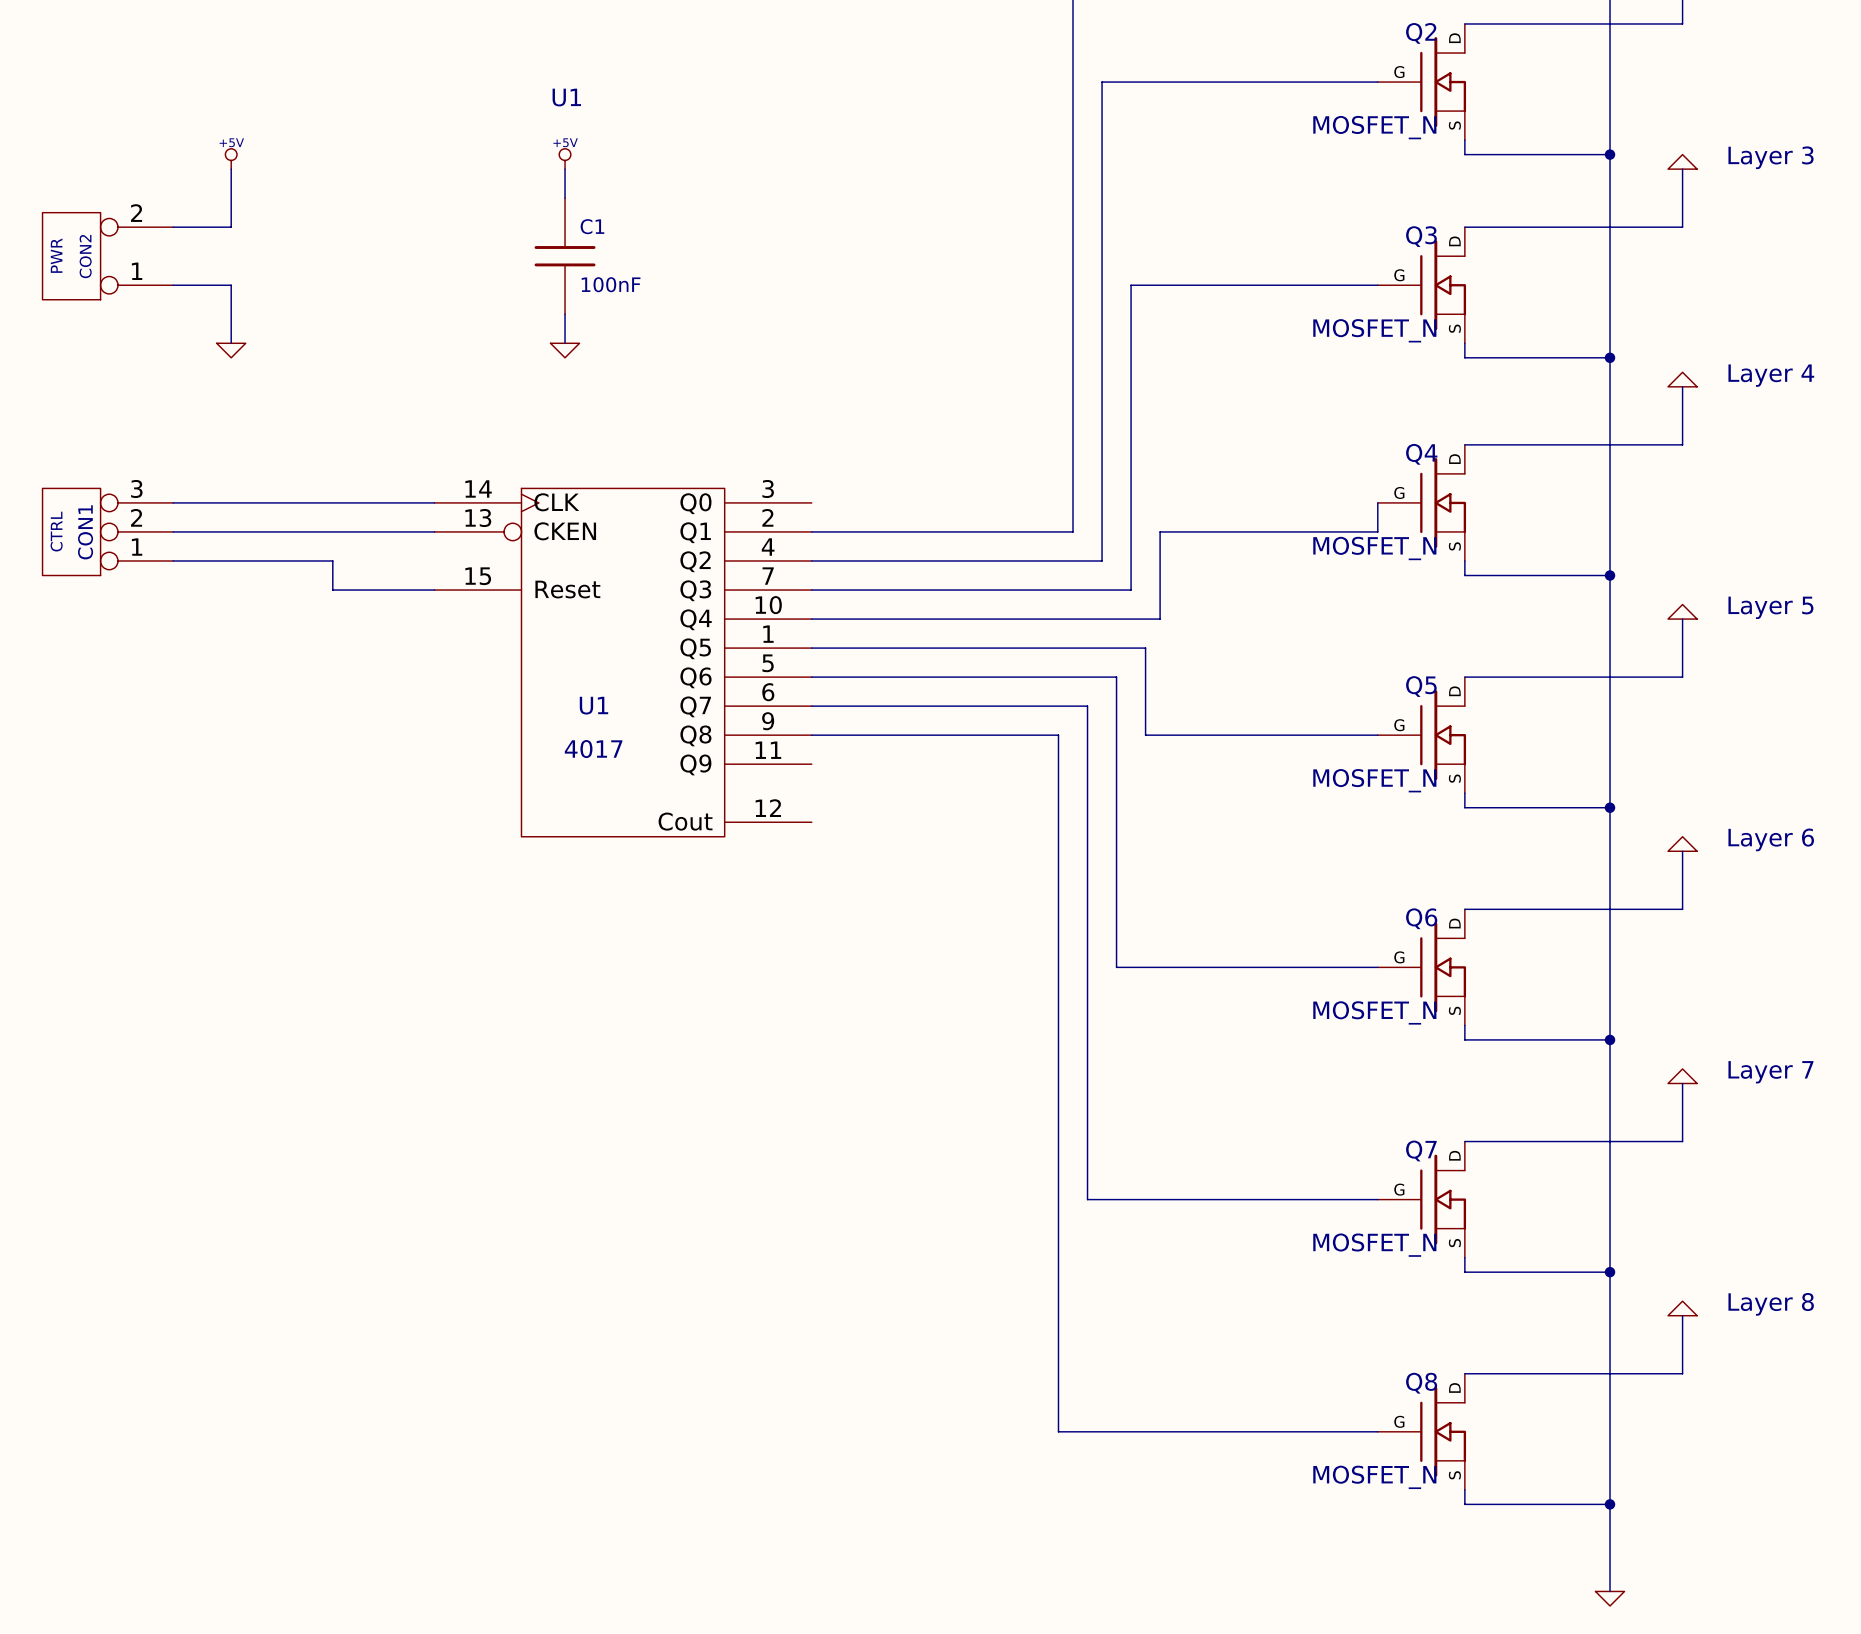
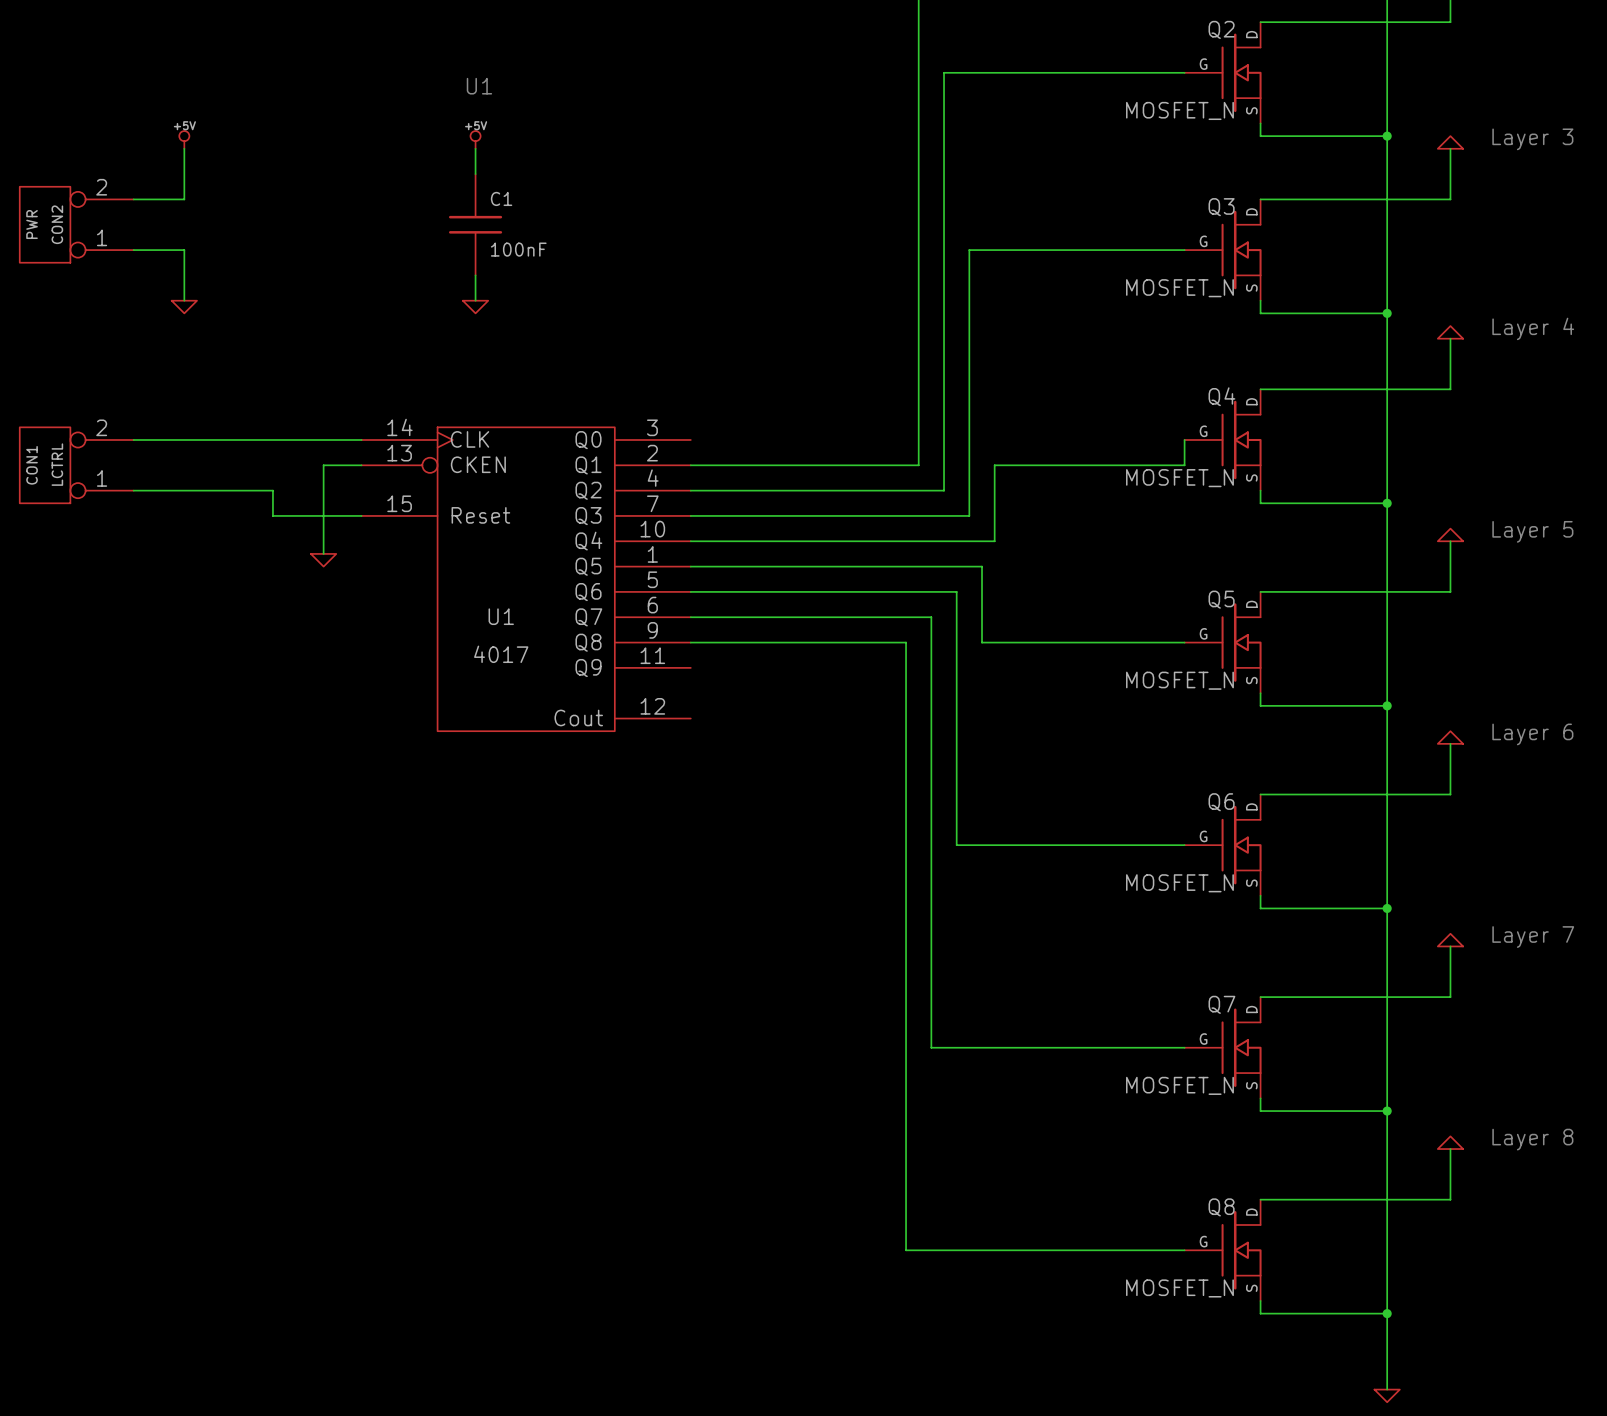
CON1: CTRL (107, 531) -> none
LCTRL: none -> CON1 (76, 465)
wire: (173, 531) (390, 531) -> (323, 553) (323, 465)
power symbol: none -> (323, 560)

